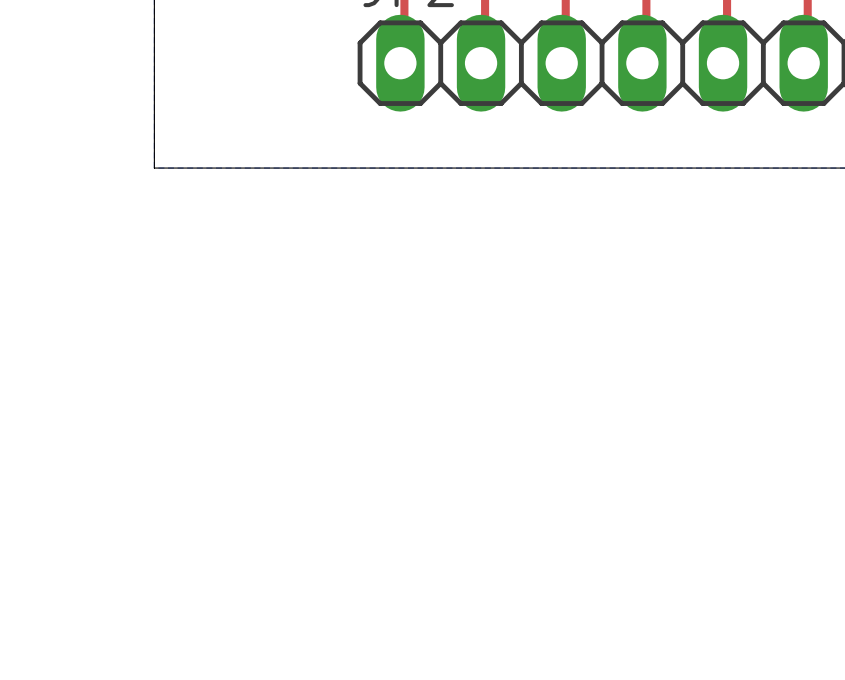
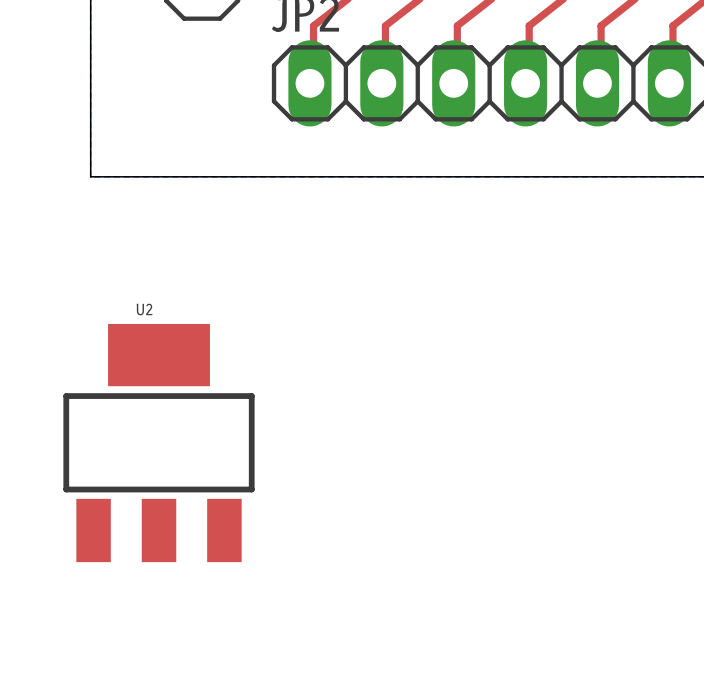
U2: none -> (159, 443)

